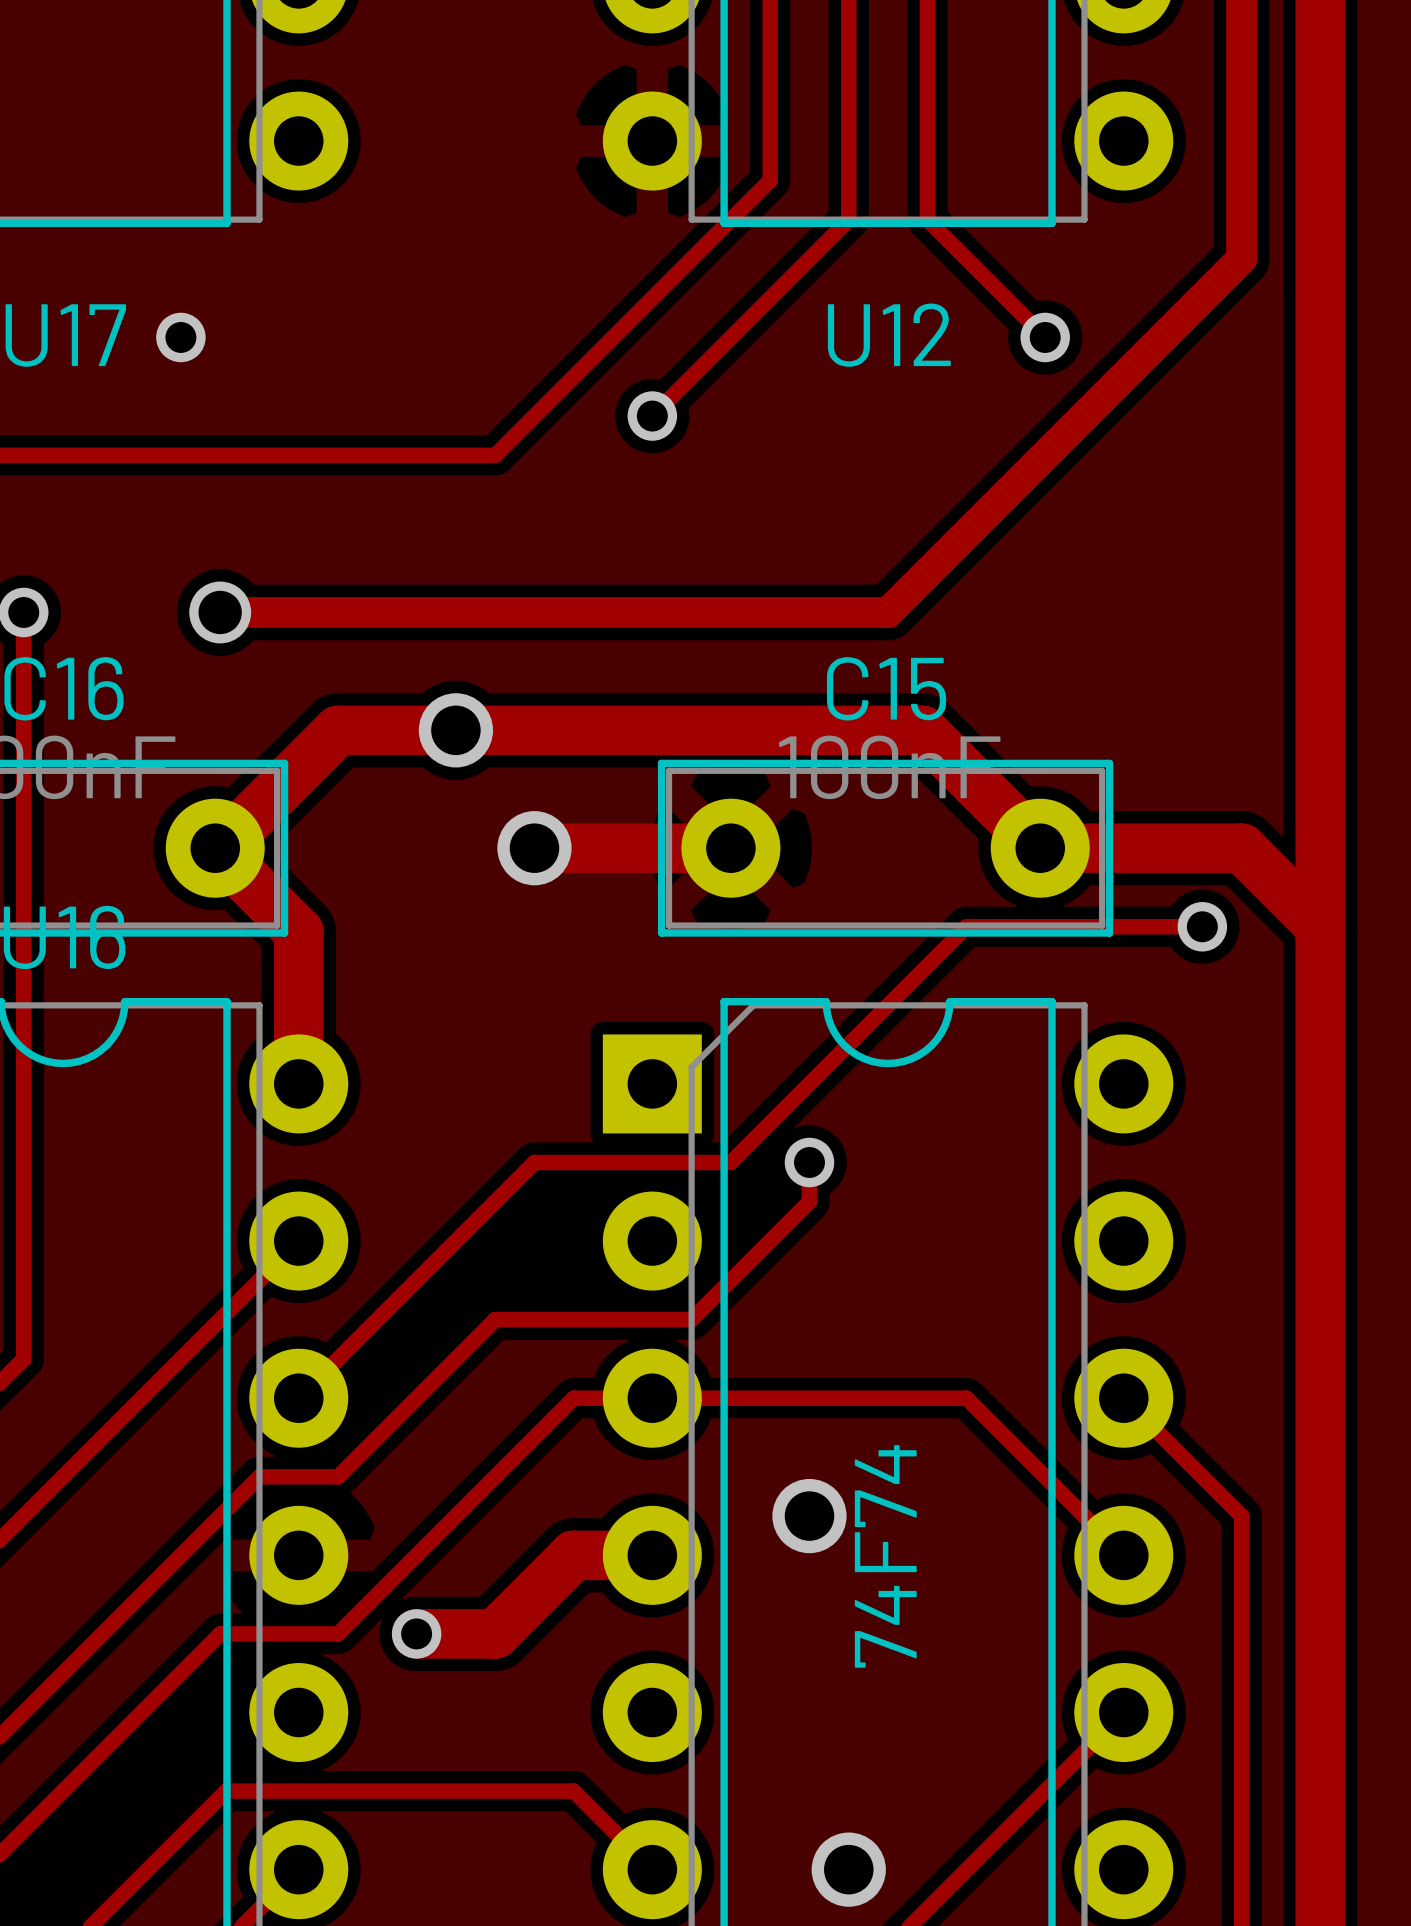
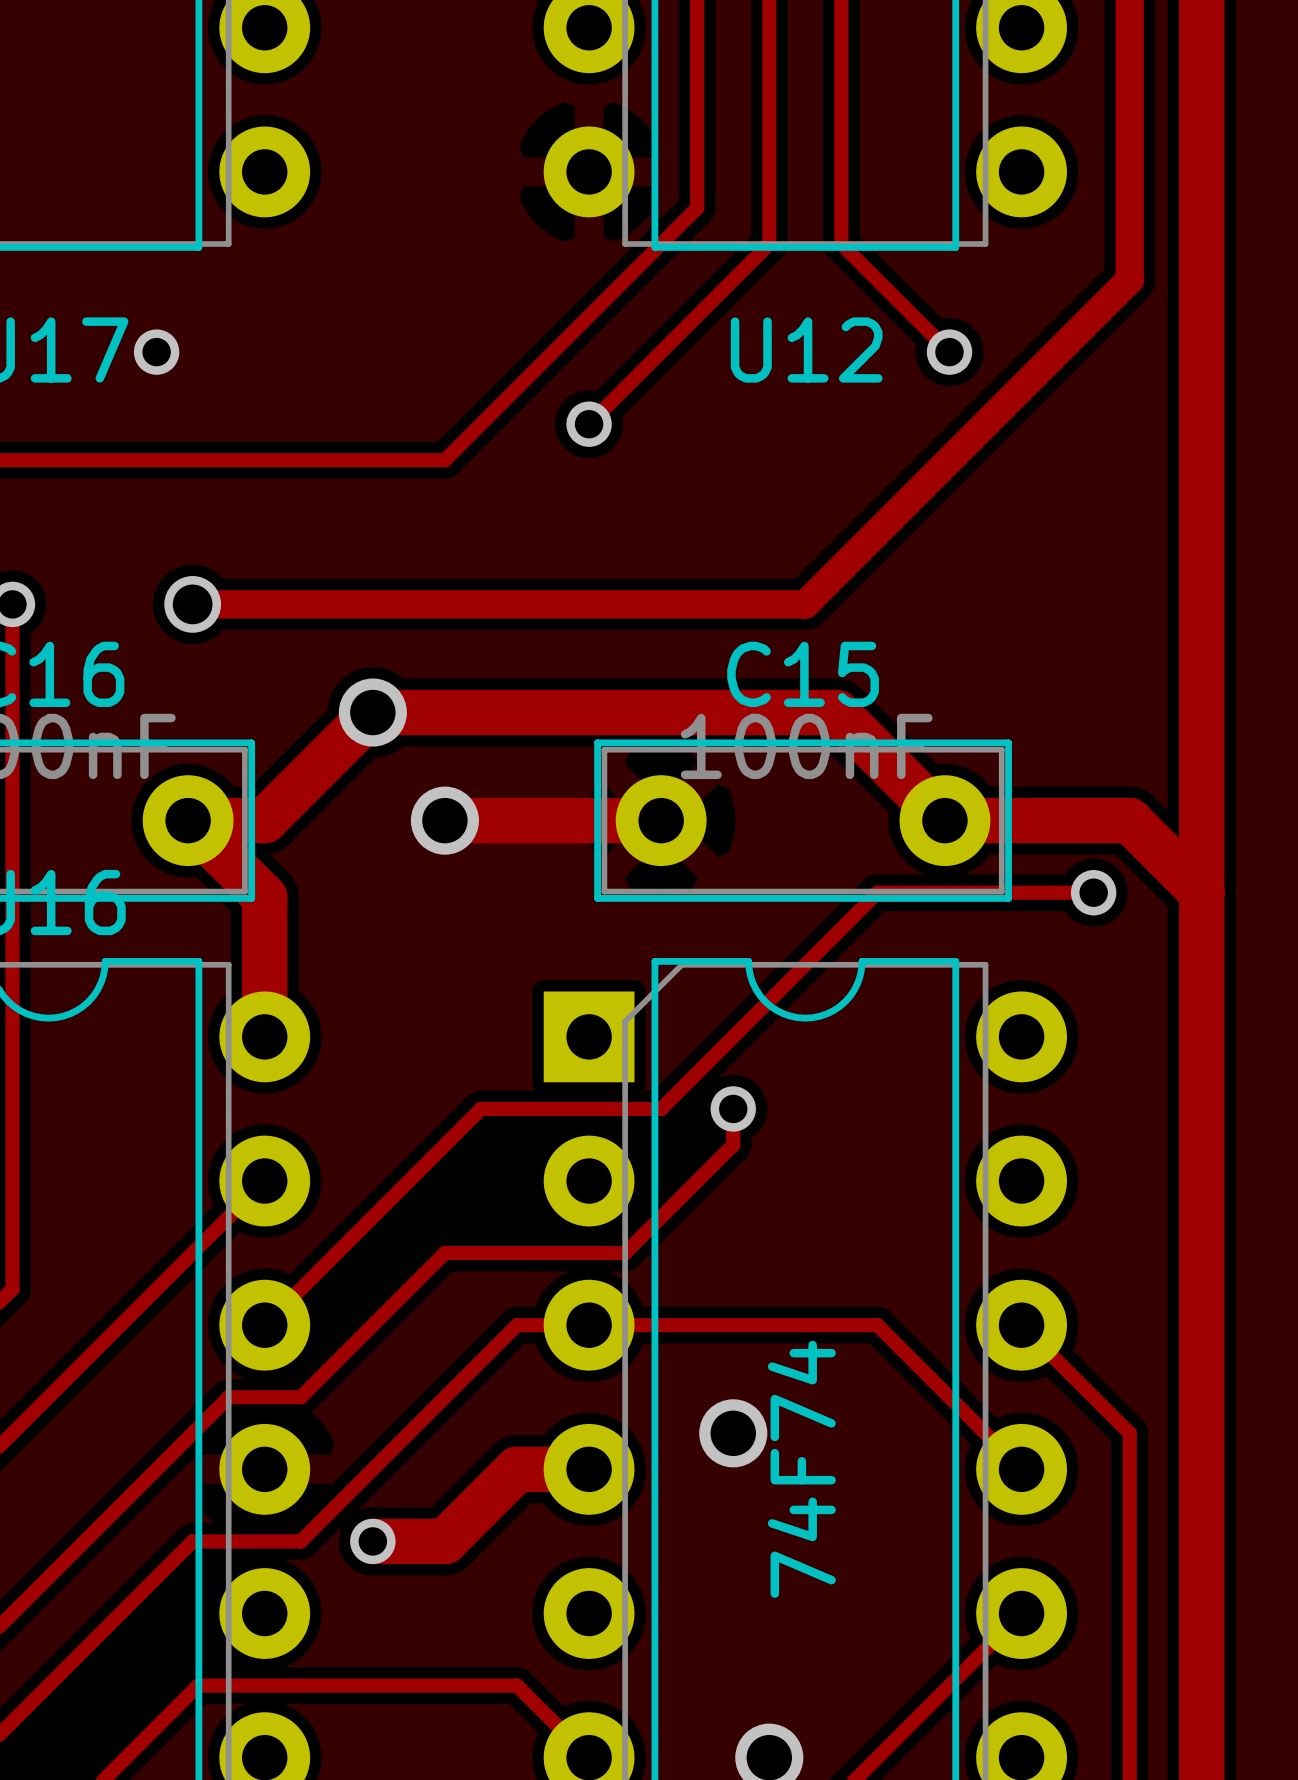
track: (416, 730) (338, 730) (220, 848) -> (372, 712) (264, 820) (192, 820)
via position: (455, 730) -> (372, 712)
via position: (534, 848) -> (444, 820)

